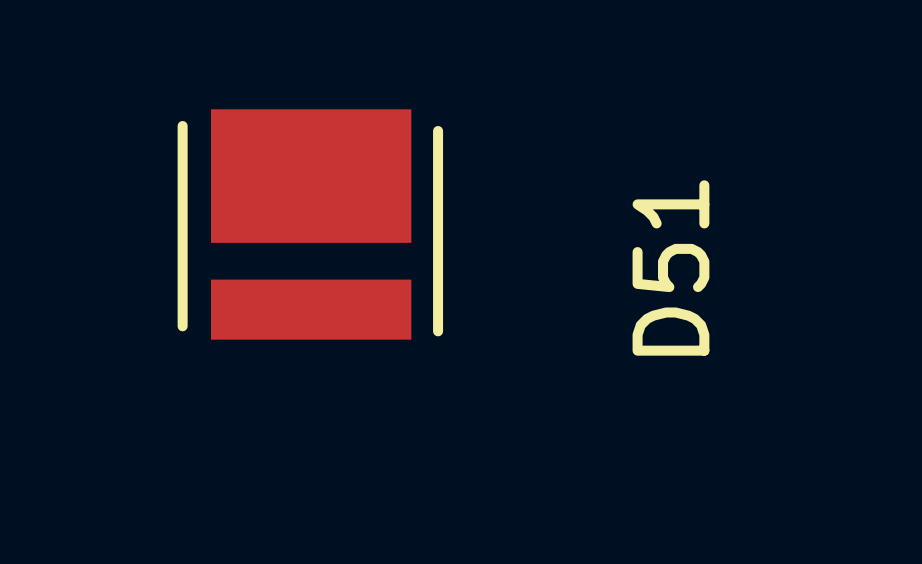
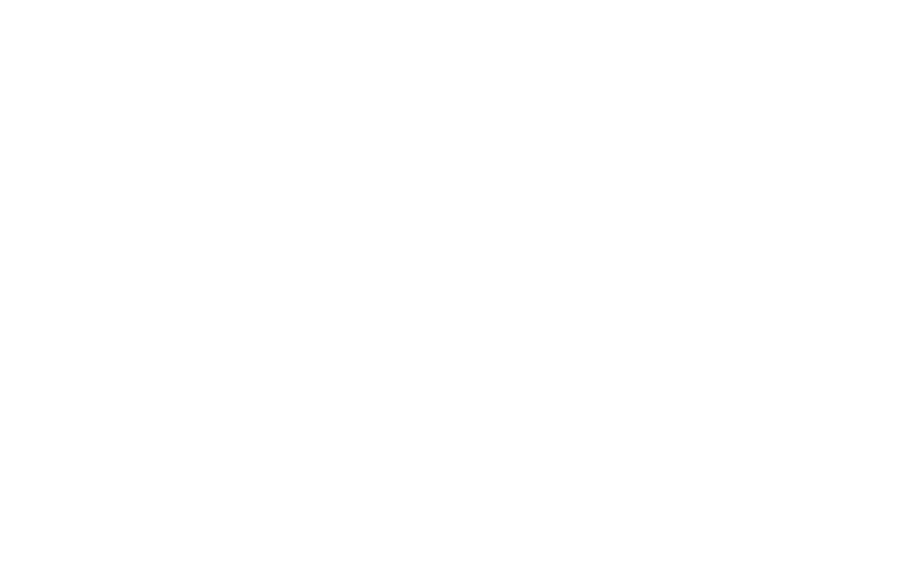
D51: (310, 224) -> none

